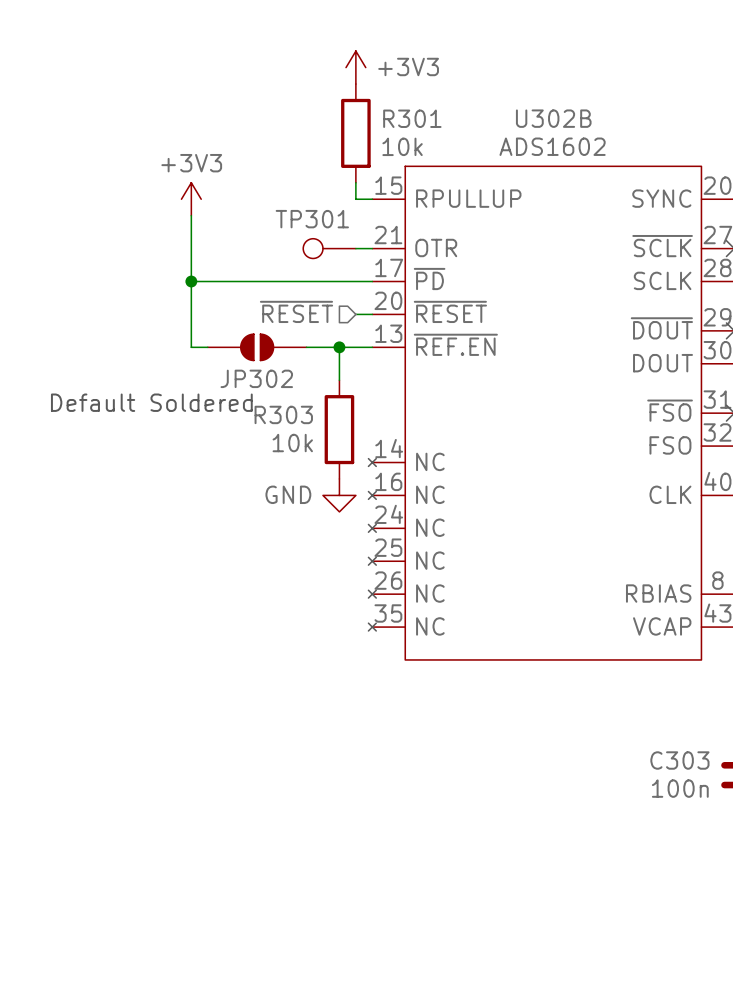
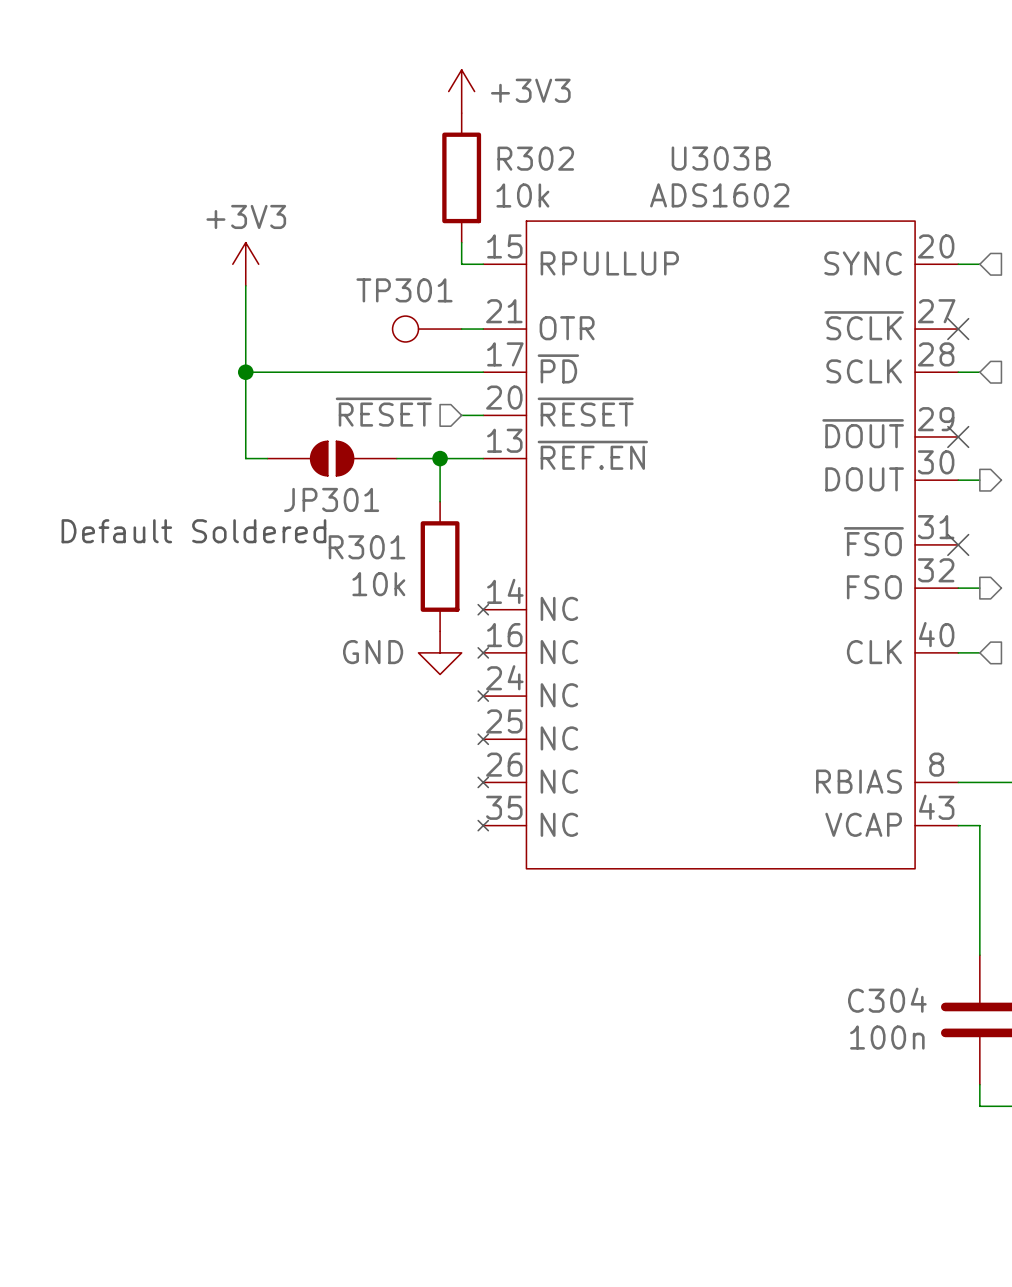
R301 name: R301 (412, 118) -> R302 (535, 158)
U302B name: U302B (553, 118) -> U303B (721, 158)
JP302 name: JP302 (256, 378) -> JP301 (331, 499)
R303 name: R303 (283, 414) -> R301 (367, 547)
C303 name: C303 (679, 760) -> C304 (887, 1000)

